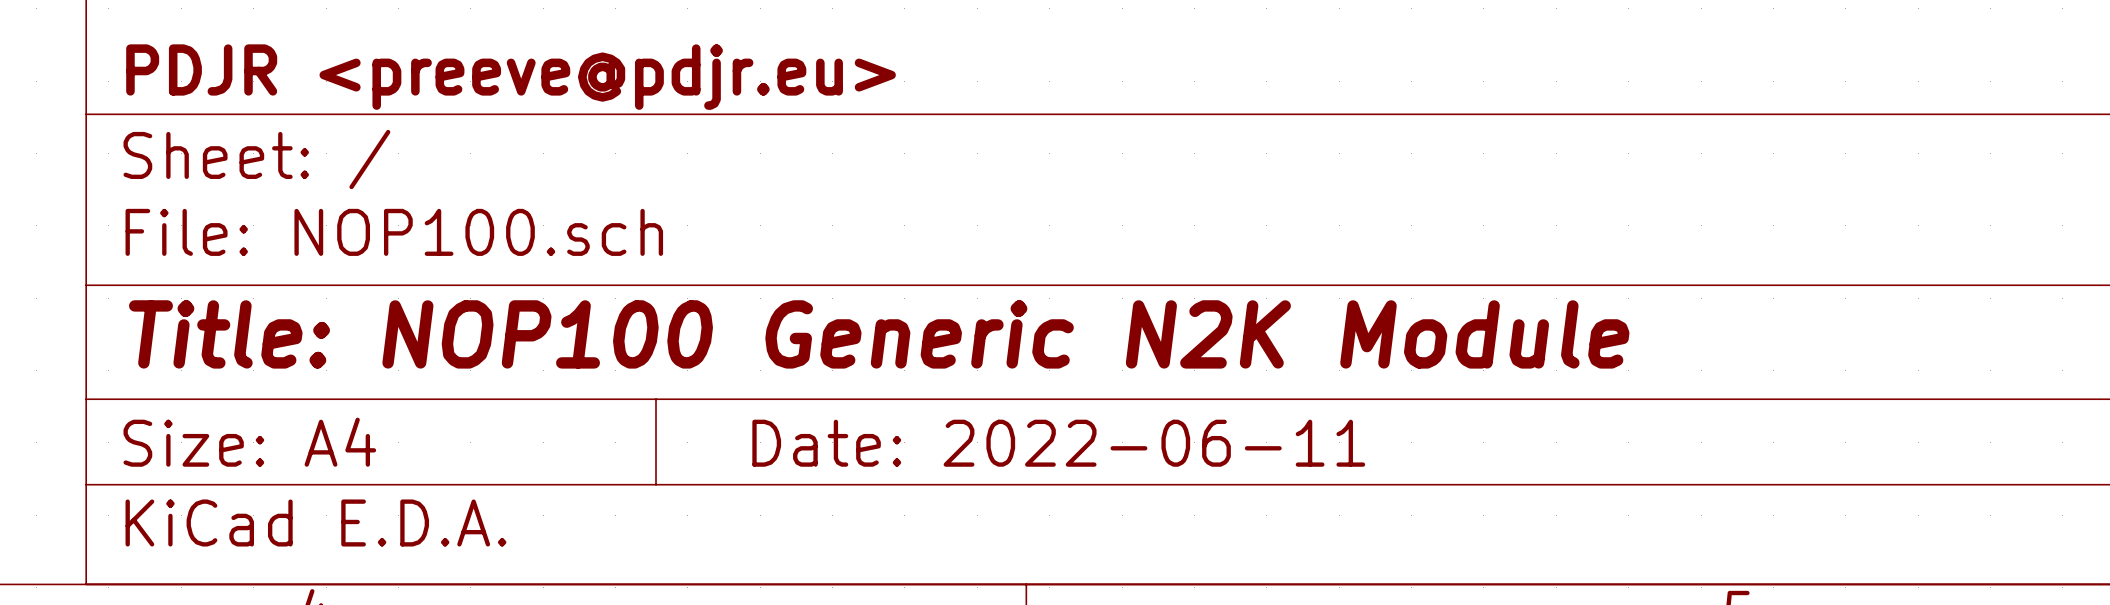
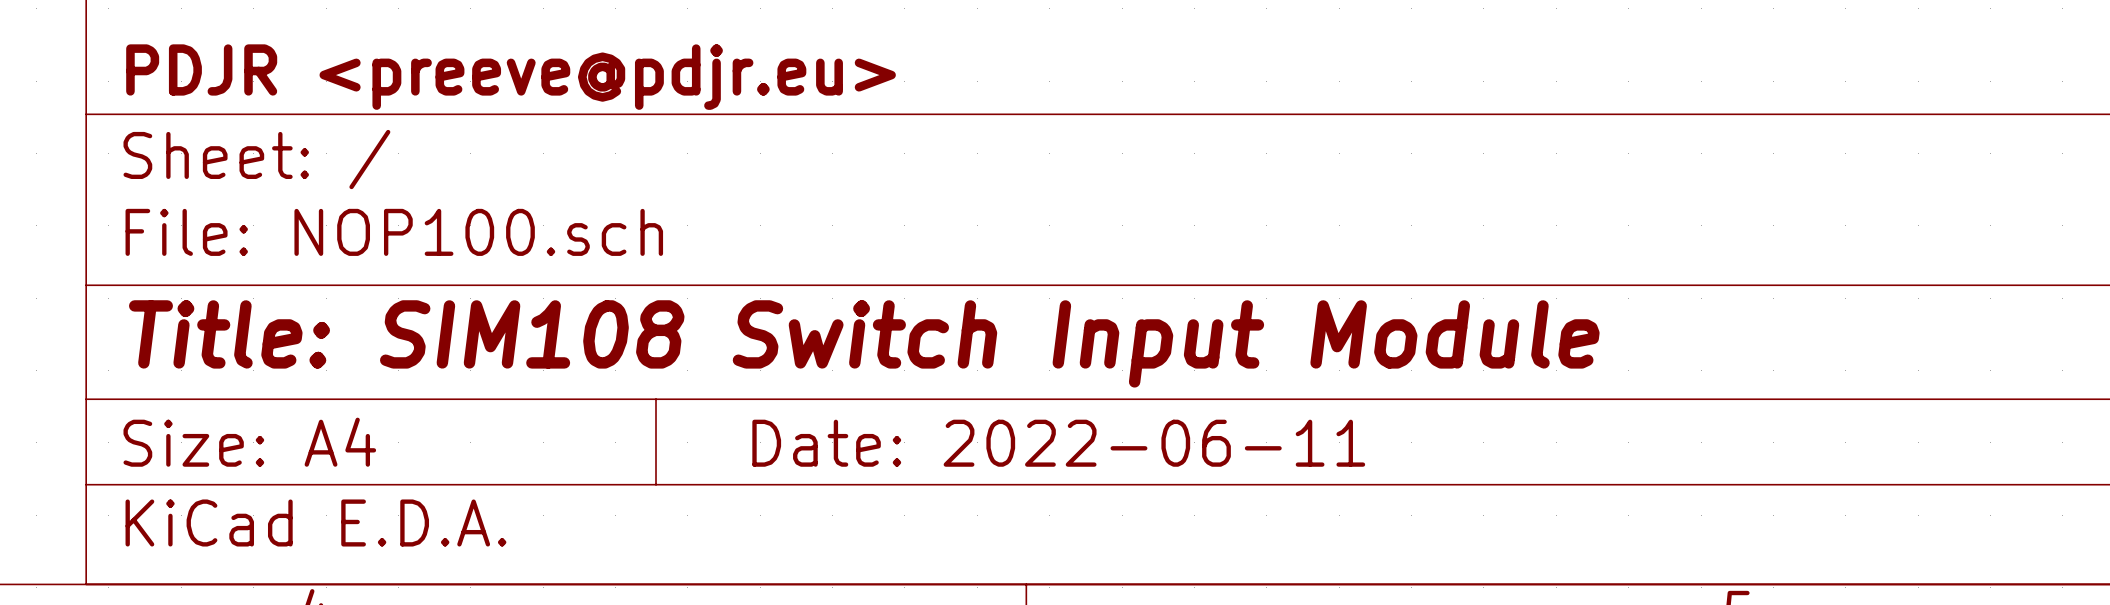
title block: Title: NOP100 Generic N2K Module (879, 334) -> Title: SIM108 Switch Input Module (864, 343)

